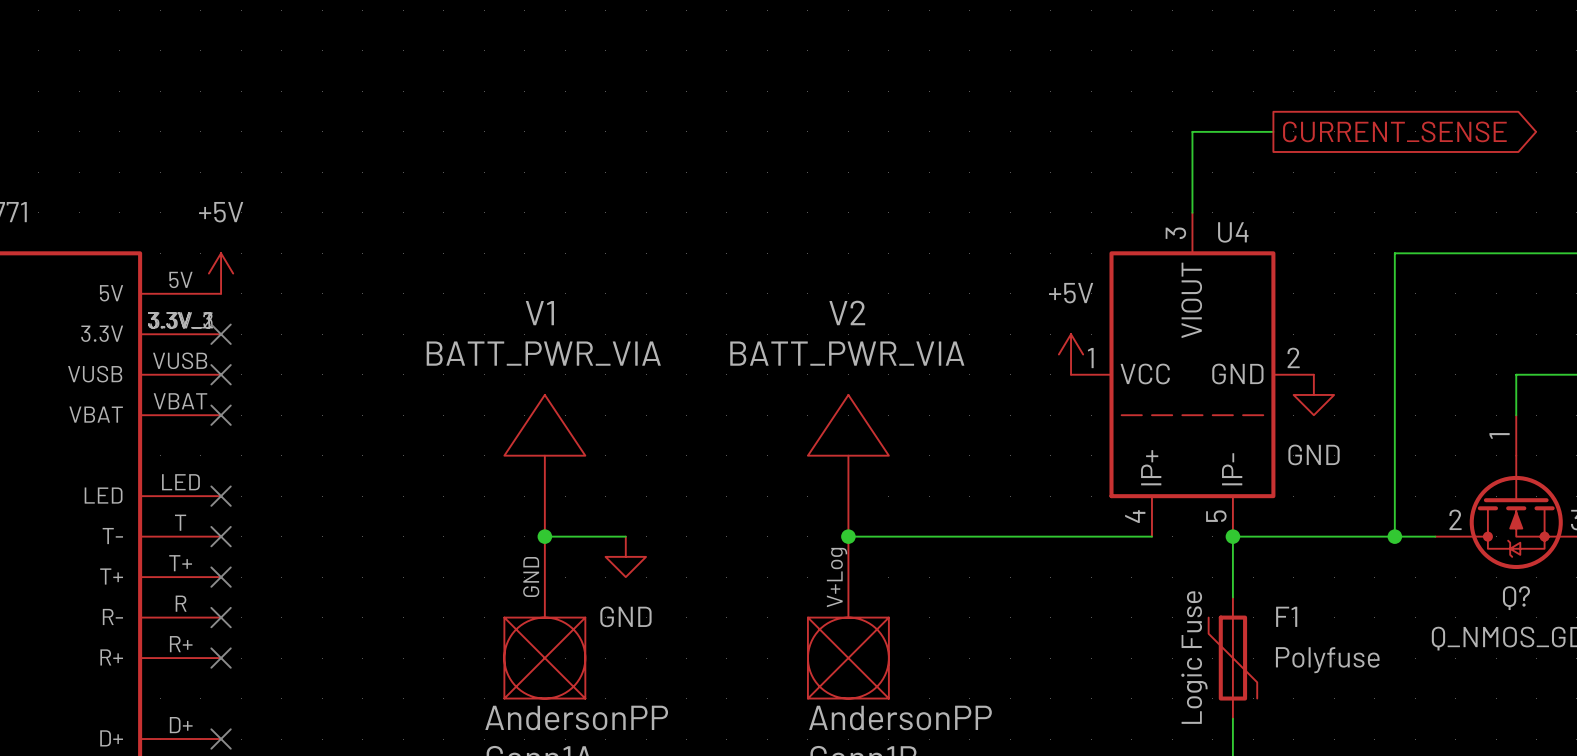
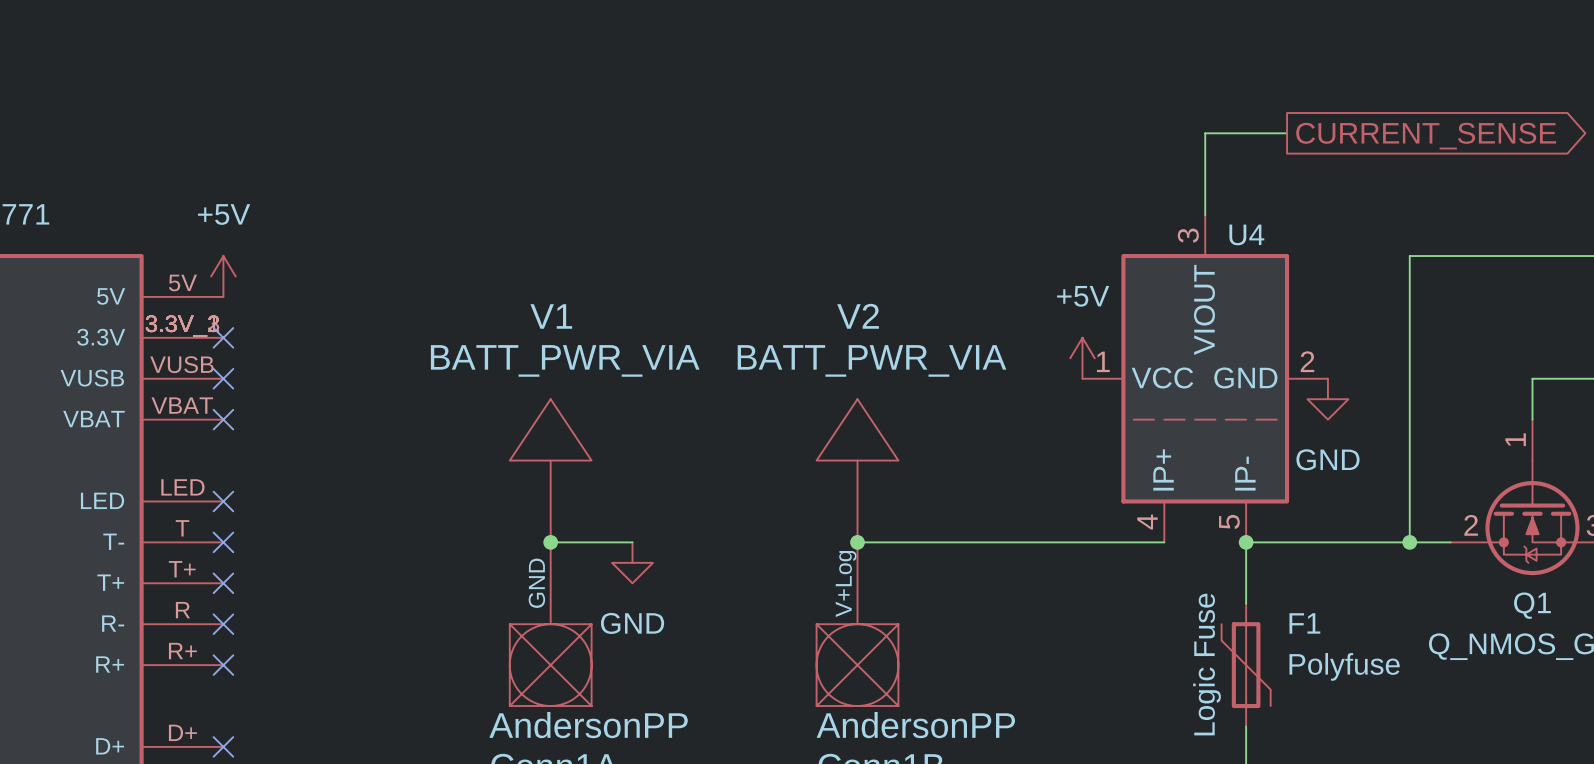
Q? name: Q? (1516, 598) -> Q1 (1532, 605)

